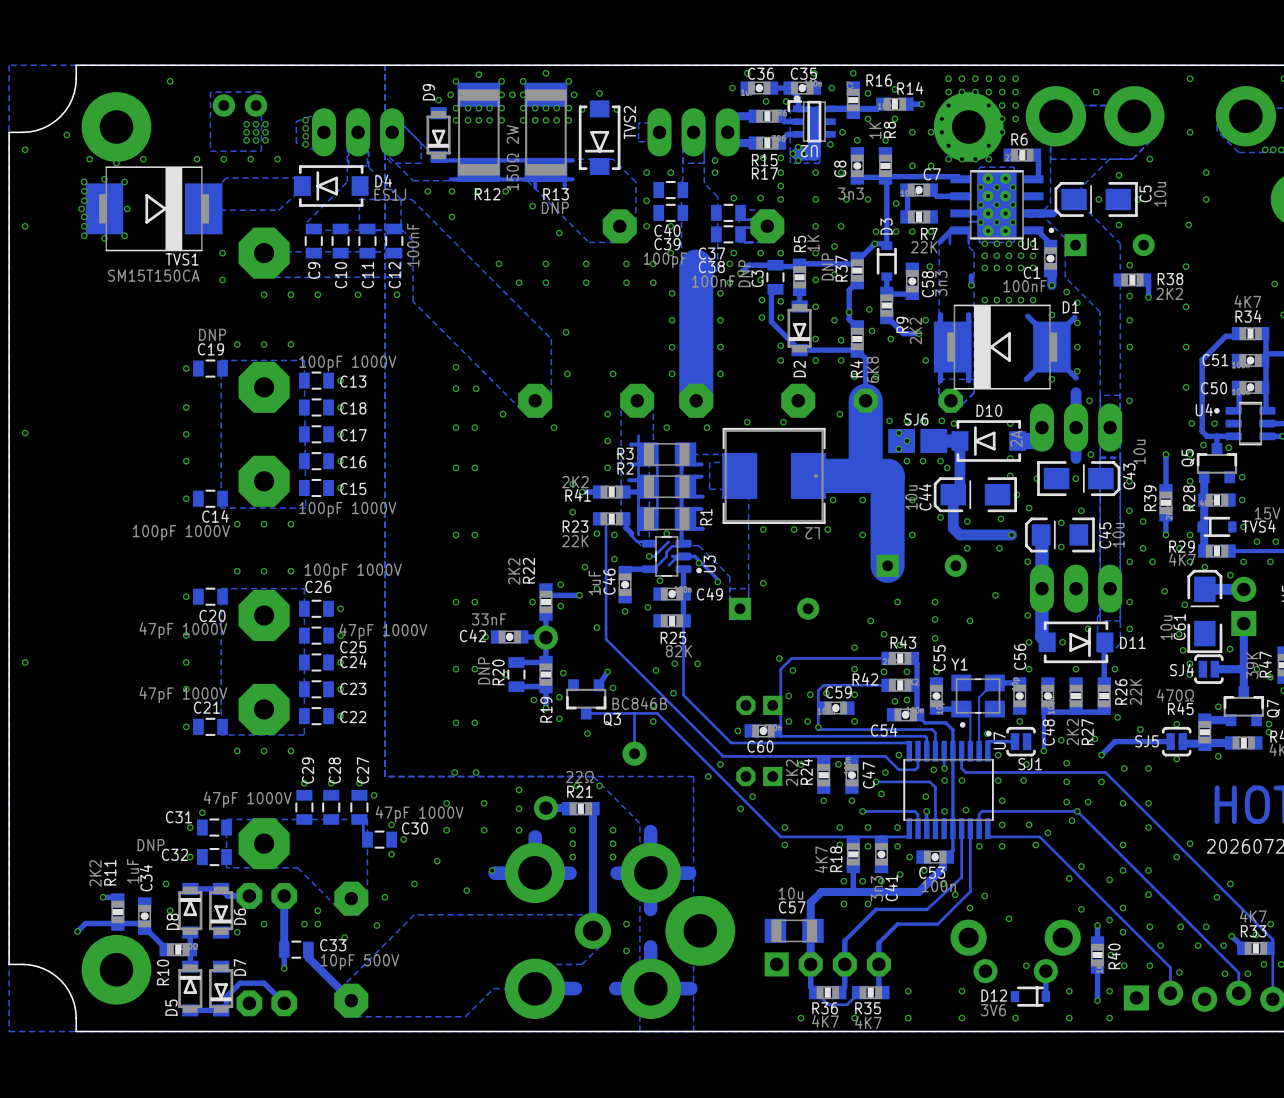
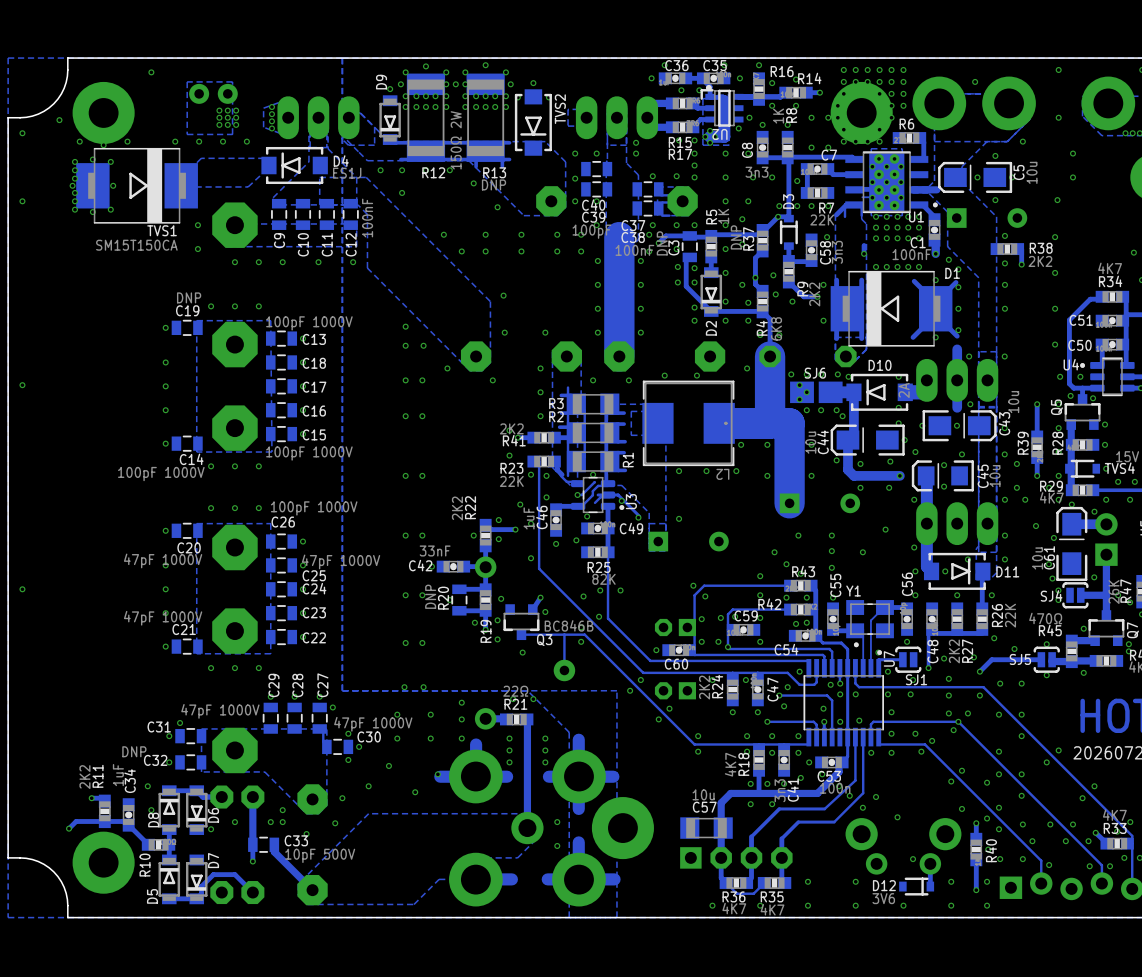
R47 value: 39K (1252, 665) -> 26K (1114, 592)

